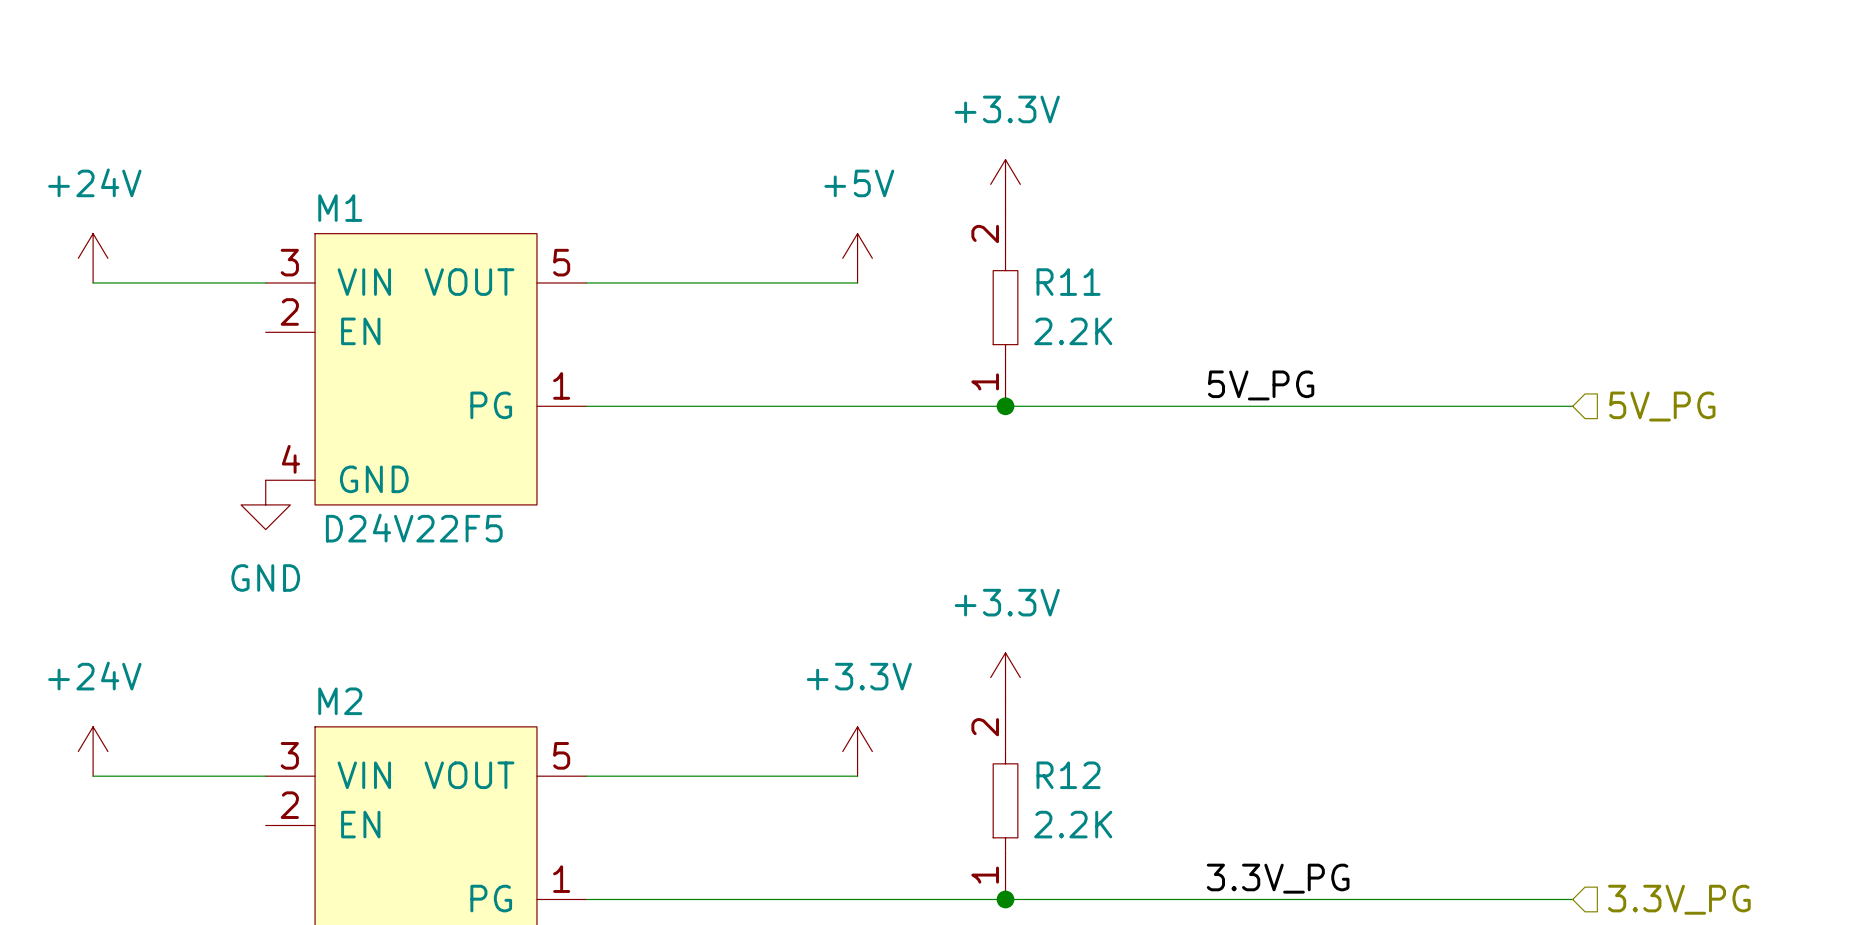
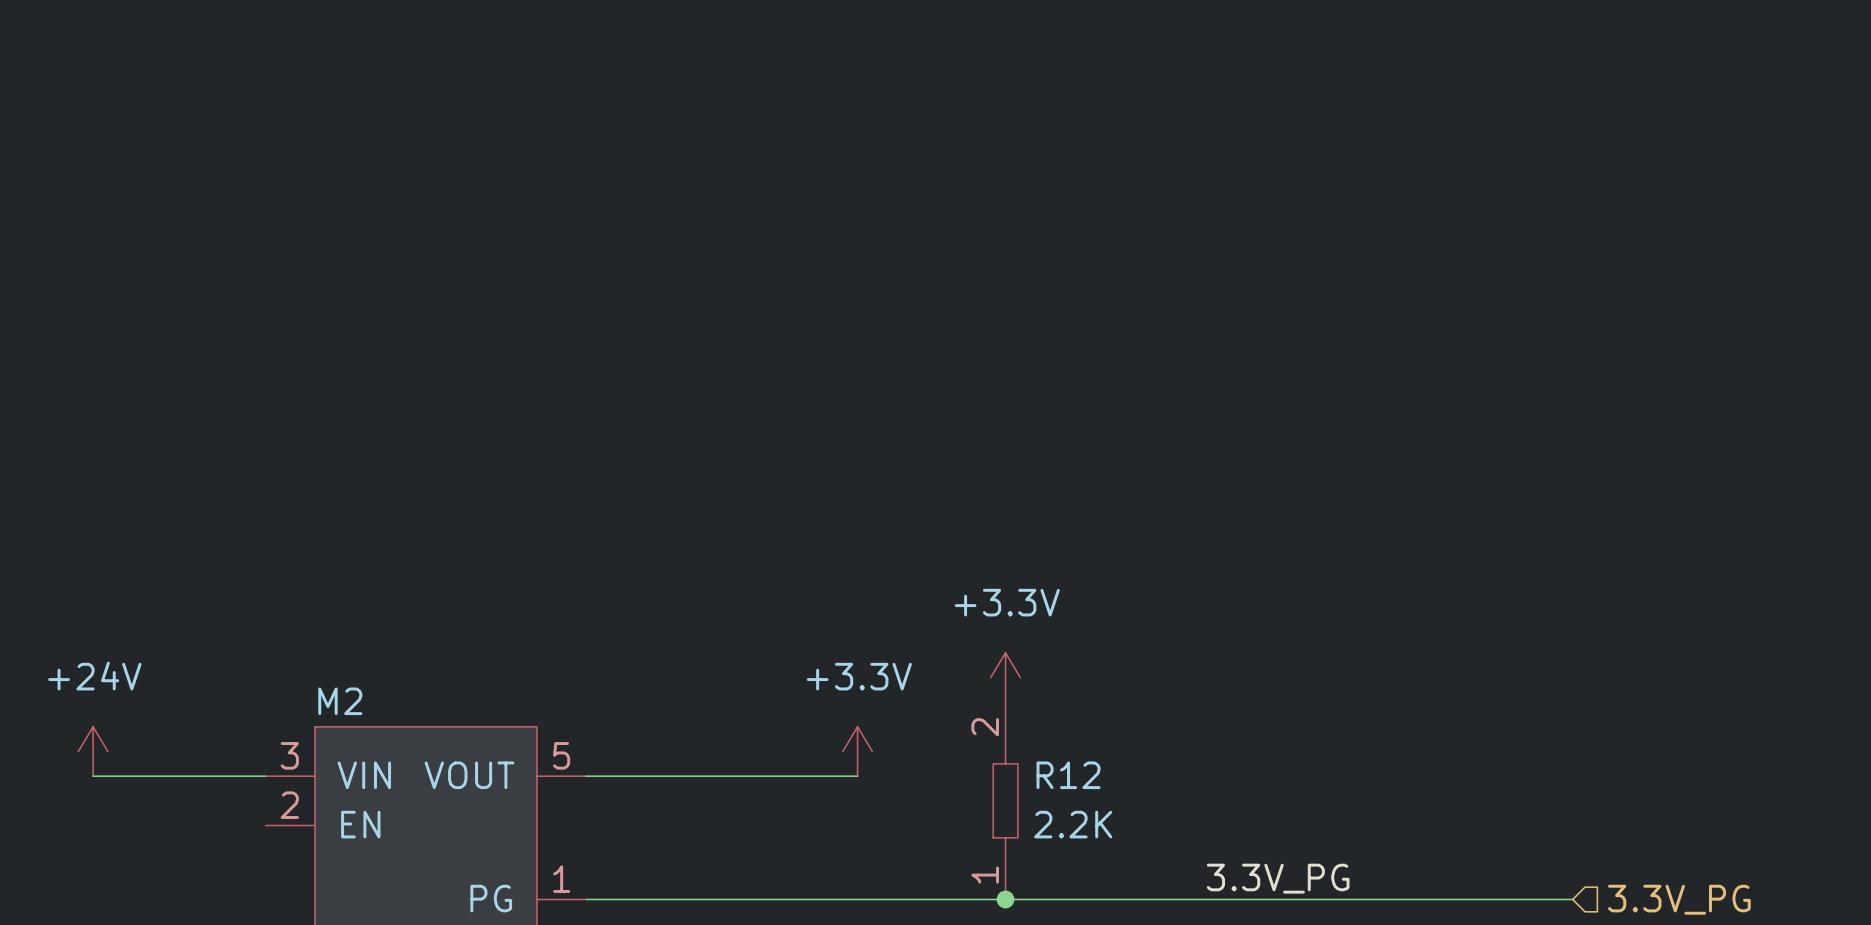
power symbol: +3.3V (1005, 184) -> none
power symbol: +24V (93, 258) -> none
power symbol: +5V (857, 258) -> none
wire: (93, 282) (265, 282) -> none
wire: (586, 282) (857, 282) -> none
R11: (1005, 307) -> none
M1: (426, 369) -> none
label: 5V_PG (1261, 385) -> none
wire: (586, 406) (1572, 406) -> none
junction: (1005, 406) -> none
hierarchical label: 5V_PG (1662, 406) -> none
power symbol: GND (265, 504) -> none

